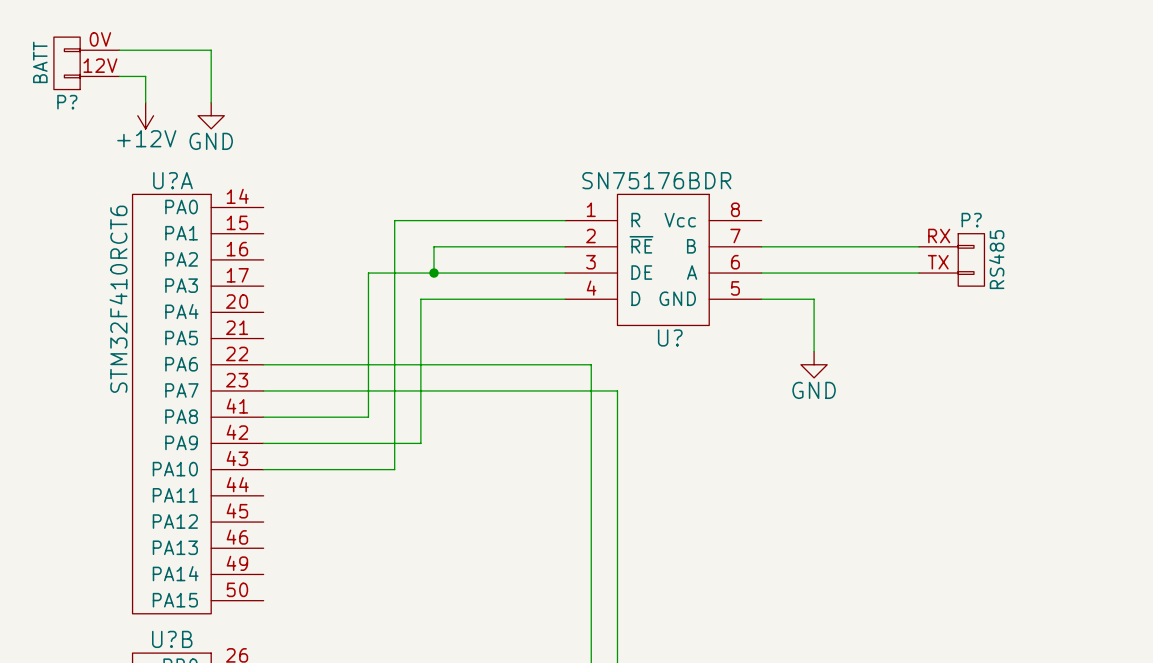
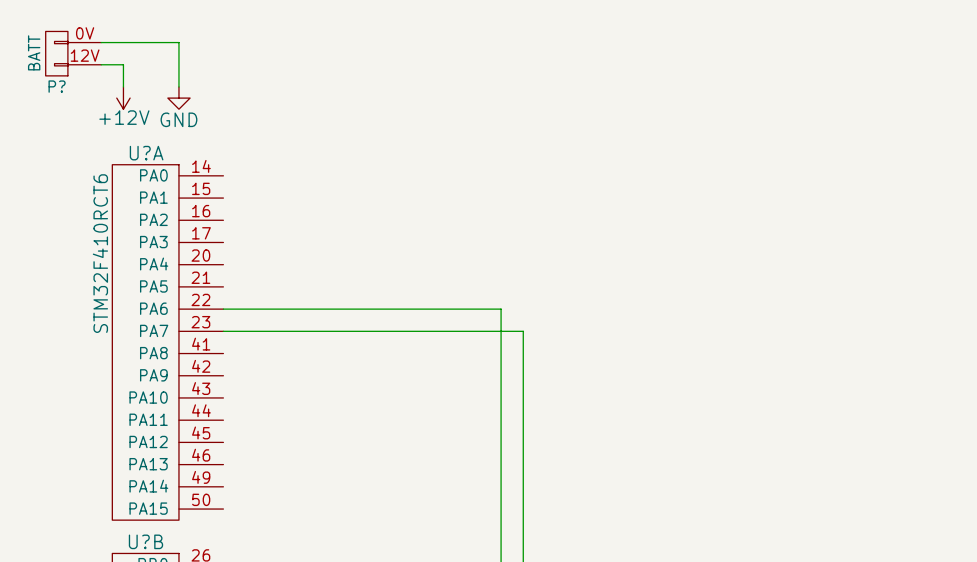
wire: (565, 220) (394, 220) (394, 469) (263, 469) -> none
wire: (565, 246) (433, 246) (433, 273) -> none
wire: (761, 246) (918, 246) -> none
U?: SN75176BDR (663, 259) -> none
P?: RS485 (951, 259) -> none
junction: (433, 273) -> none
wire: (565, 273) (368, 273) (368, 417) (263, 417) -> none
wire: (761, 273) (918, 273) -> none
wire: (565, 299) (420, 299) (420, 443) (263, 443) -> none
wire: (761, 299) (814, 299) (814, 351) -> none
power symbol: GND (814, 364) -> none

